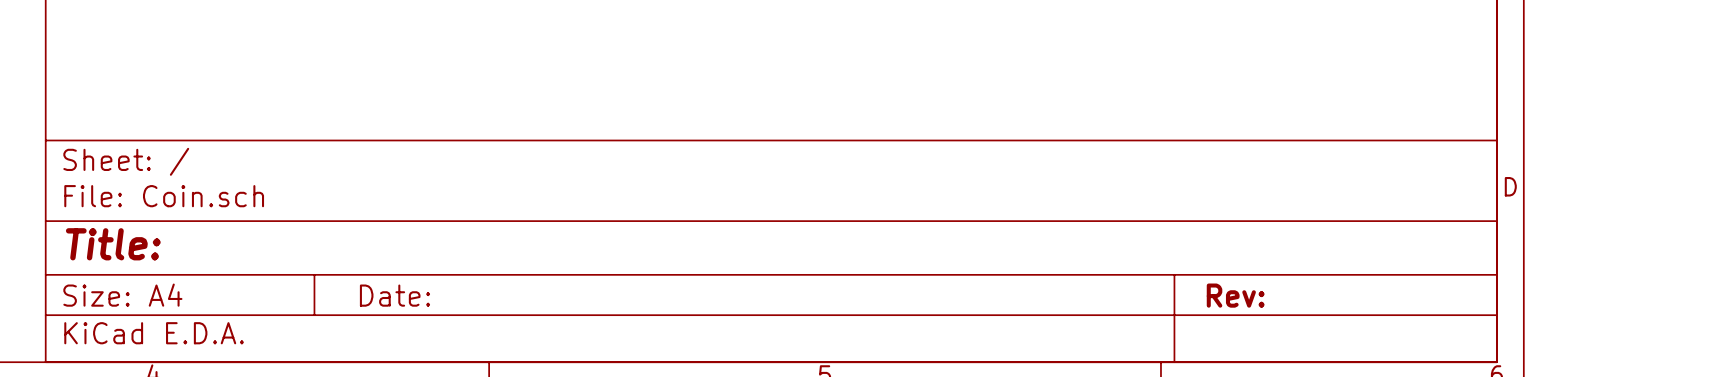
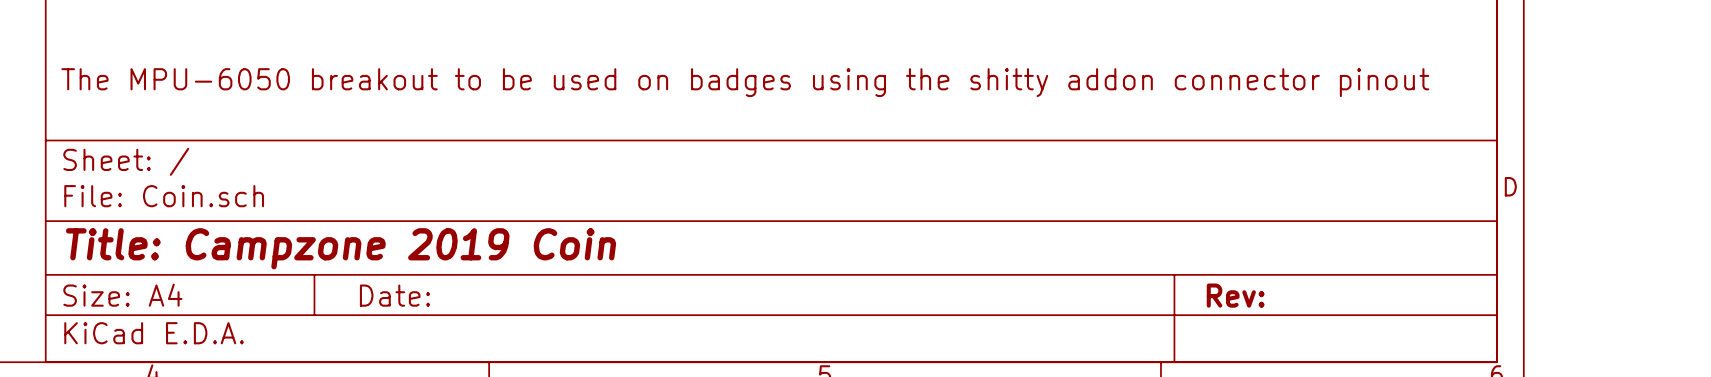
title block: none -> The MPU-6050 breakout to be used on badges using the shitty addon connector pinout (745, 82)
title block: Title: (113, 244) -> Title: Campzone 2019 Coin (341, 248)

